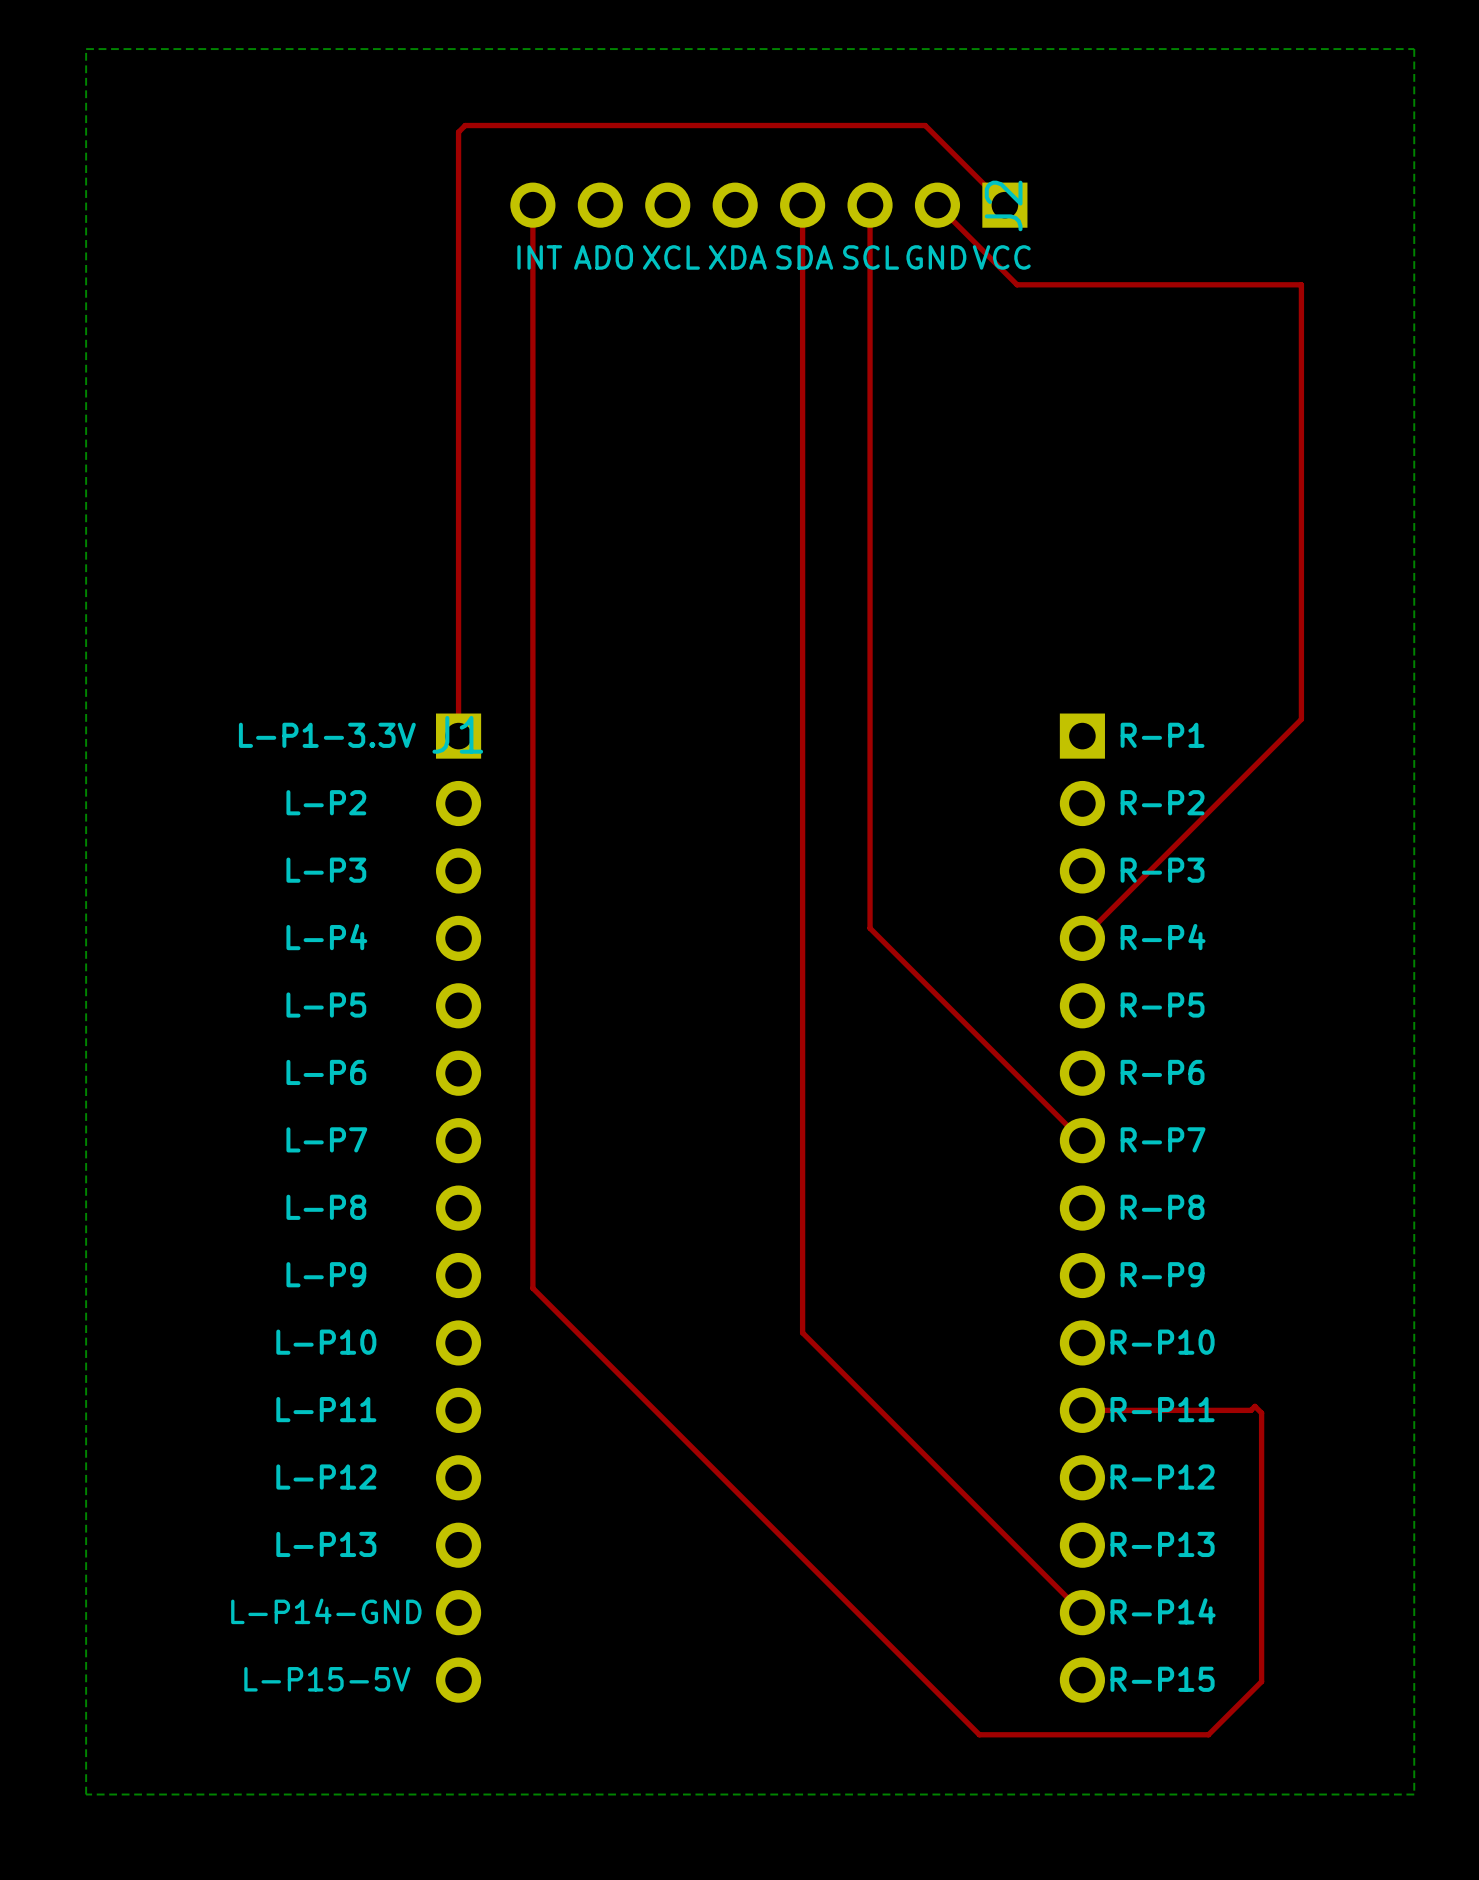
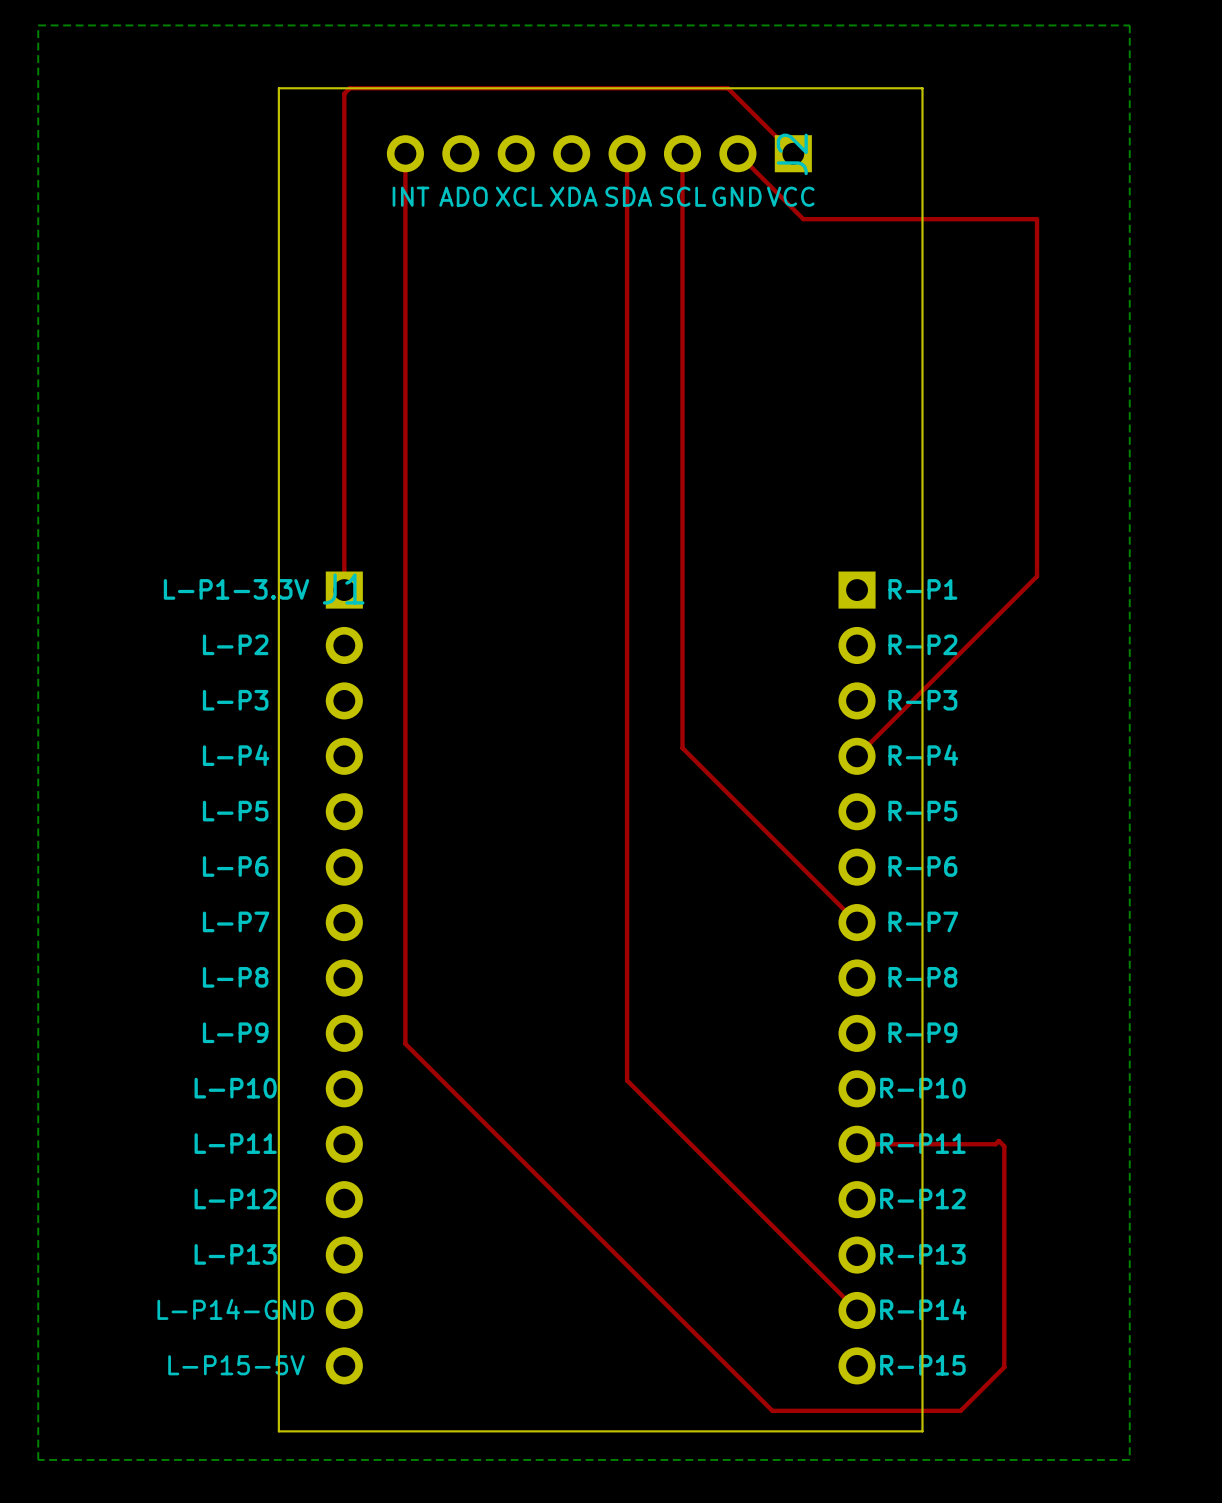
board edge: none -> (278, 88) (922, 88) (922, 1431) (278, 1431) (278, 88)

